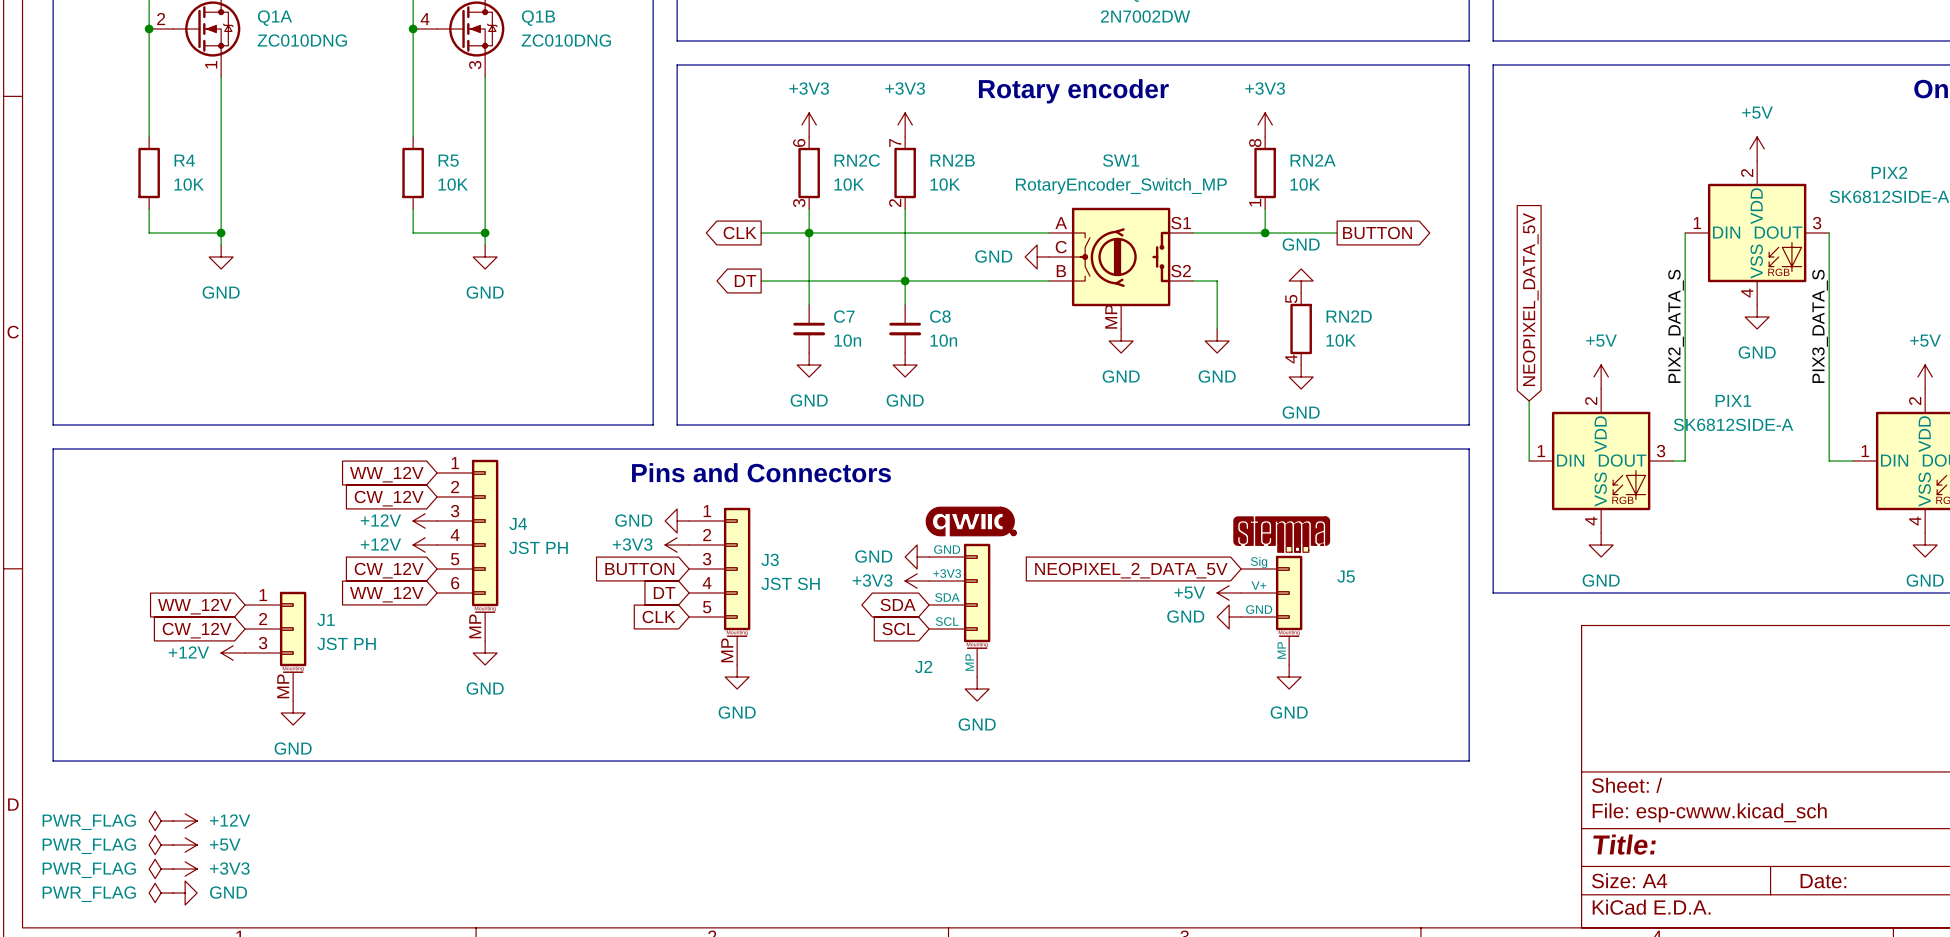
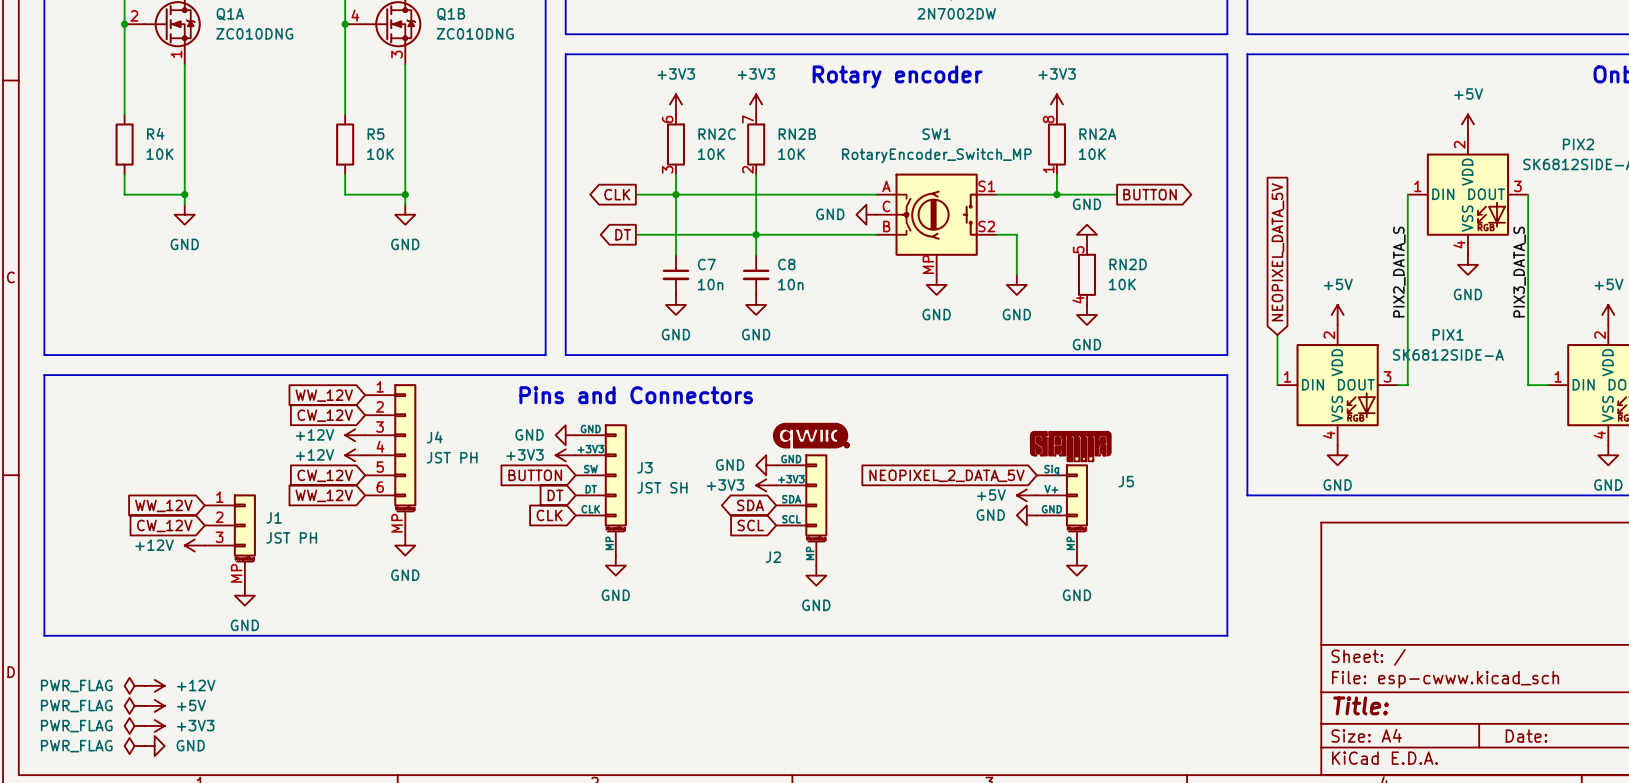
J3 symbol: [689, 507, 751, 666] -> [575, 424, 627, 556]

